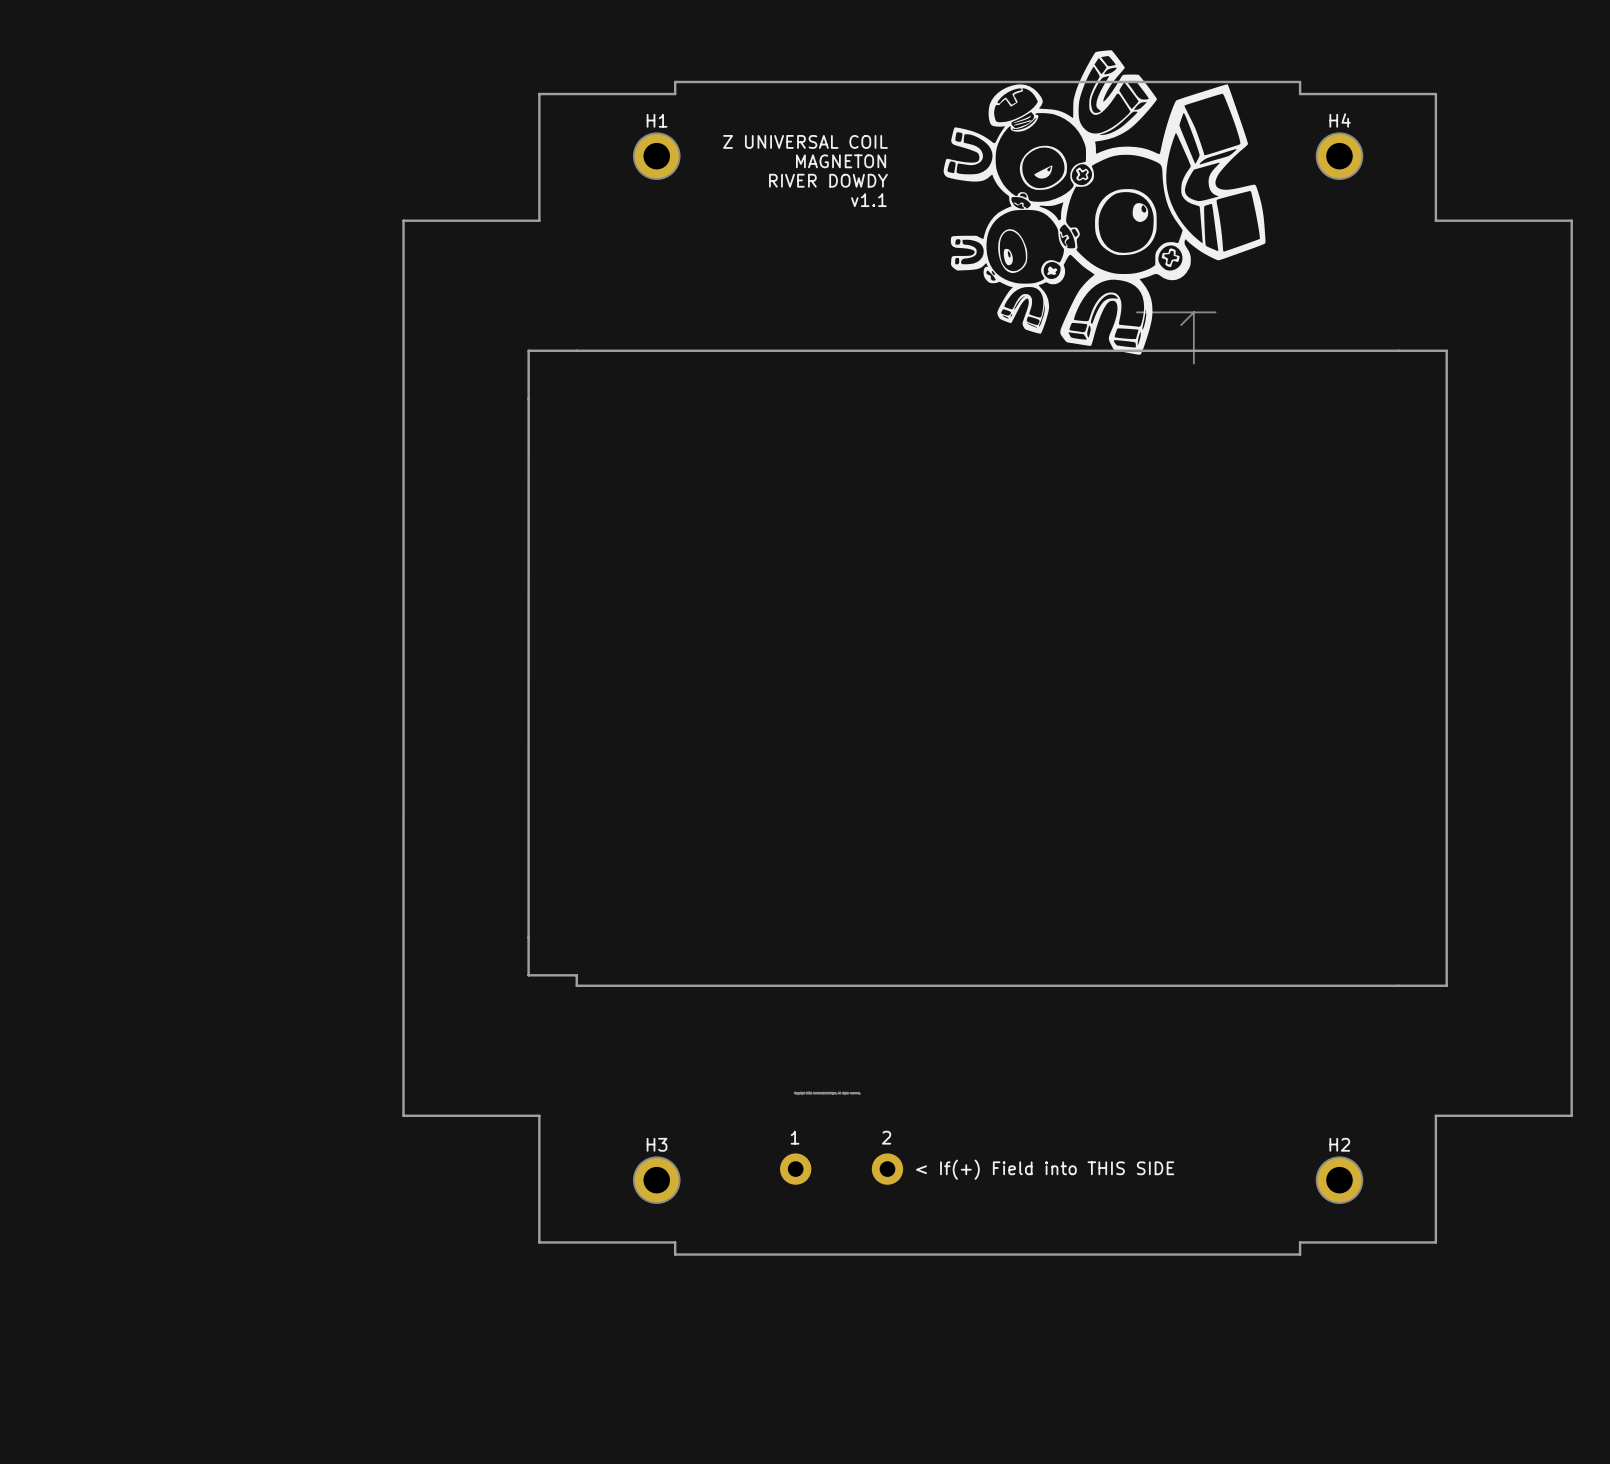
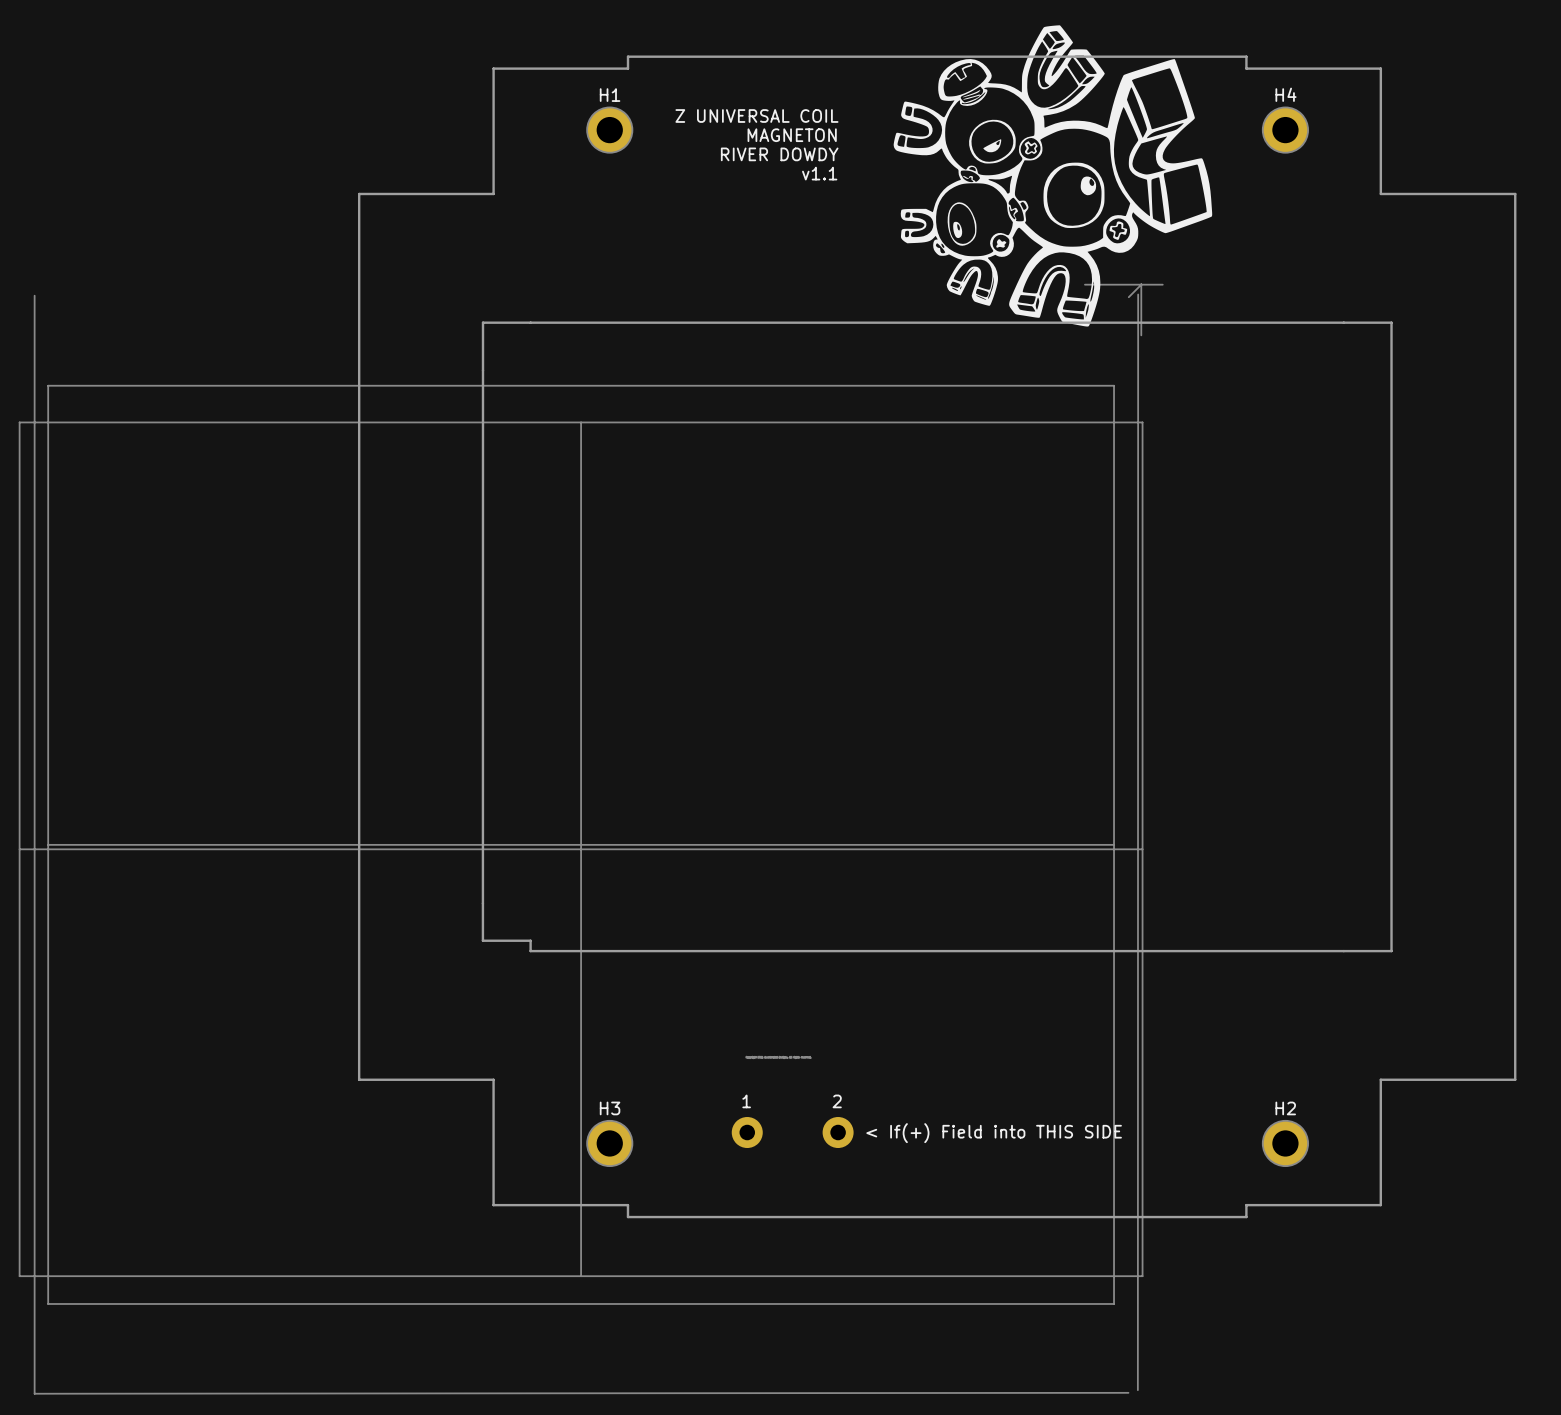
line: none -> (1138, 294) (1137, 1390)
line: none -> (34, 295) (34, 1393) (1128, 1392)
line: none -> (48, 385) (48, 1303) (1114, 1303) (1114, 385) (48, 385)
line: none -> (19, 422) (19, 1276) (1142, 1276) (1142, 422) (19, 422)
line: none -> (581, 422) (581, 1276)
line: none -> (48, 844) (1114, 844)
line: none -> (19, 849) (1142, 849)

